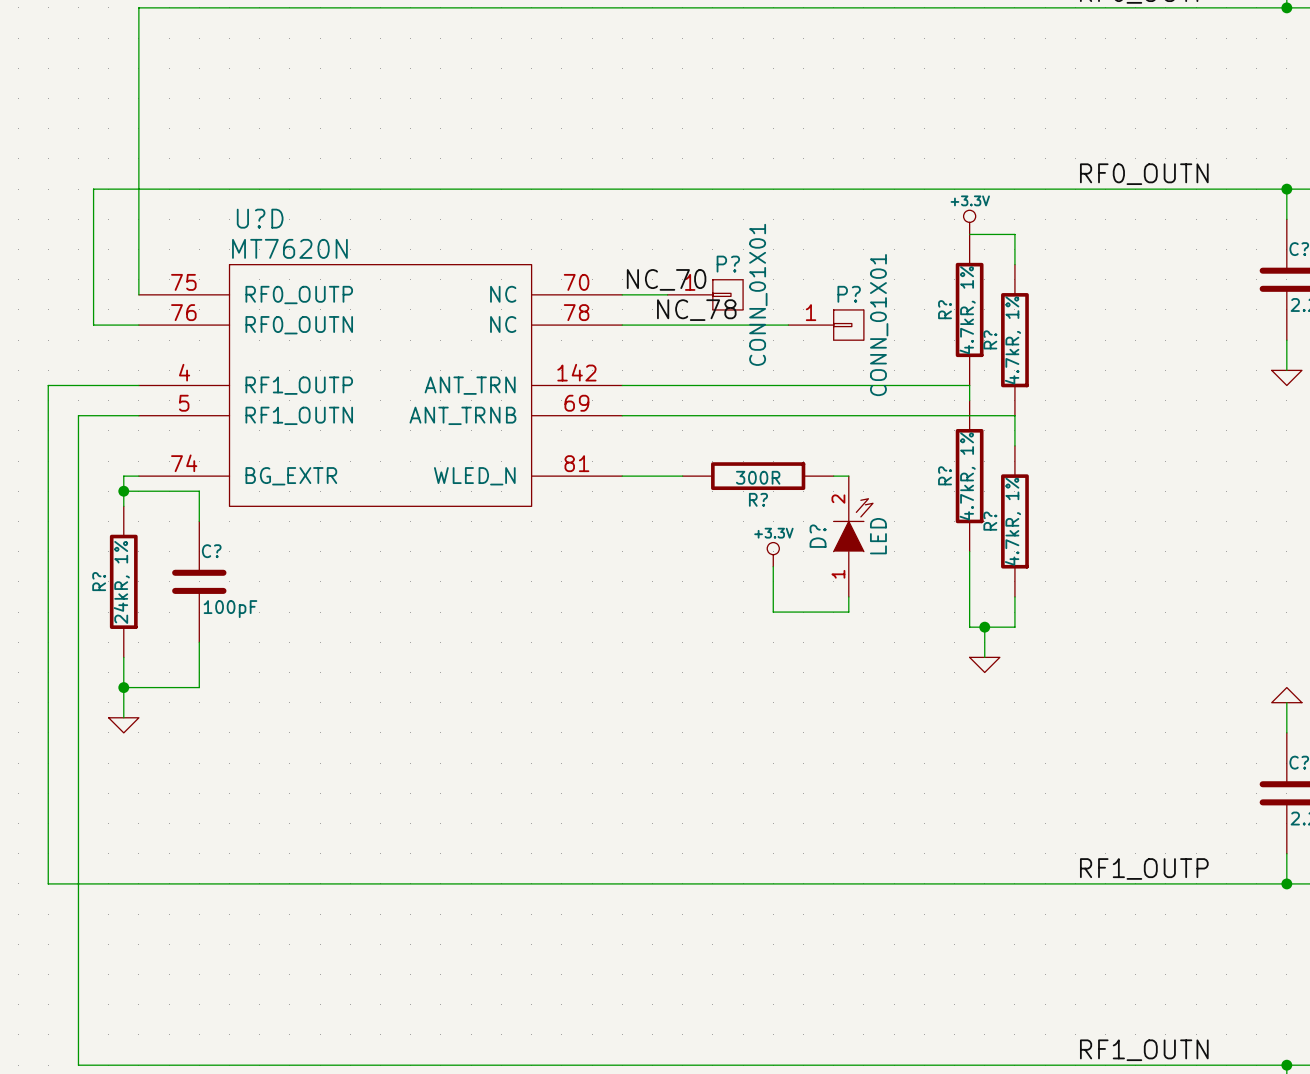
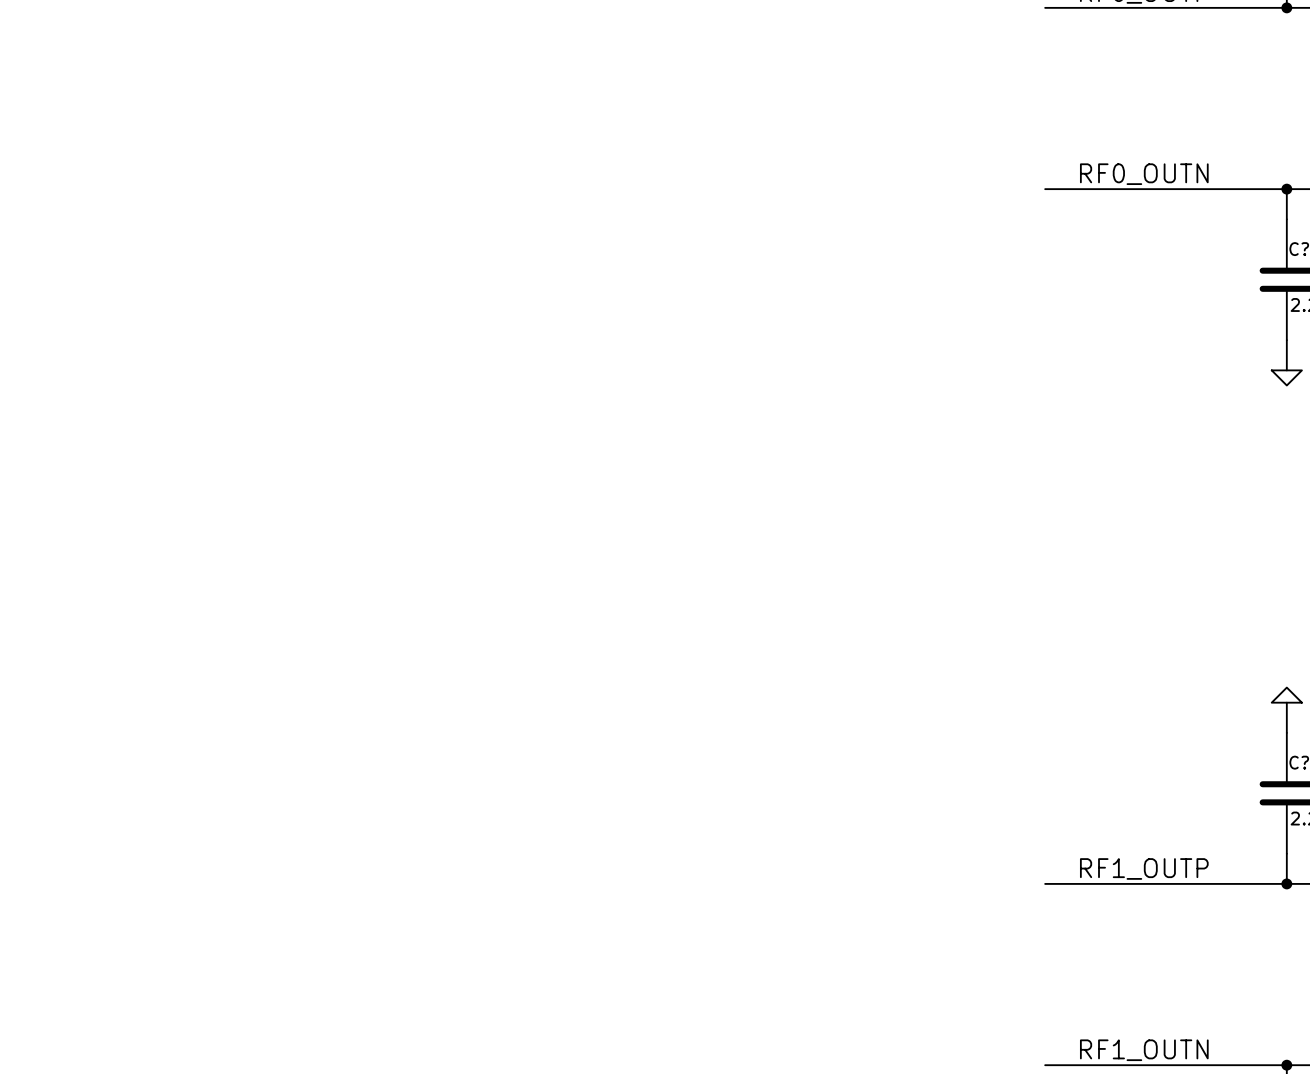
wire: (1045, 7) (138, 7) (138, 294) -> none
wire: (1045, 189) (93, 189) (93, 325) (138, 325) -> none
power symbol: +3.3V (969, 222) -> none
wire: (969, 234) (1014, 234) (1014, 264) -> none
label: NC_70 (666, 279) -> none
wire: (622, 294) (667, 294) -> none
P?: CONN_01X01 (705, 294) -> none
R?: 4.7kR, 1% (969, 309) -> none
label: NC_78 (696, 310) -> none
wire: (622, 325) (788, 325) -> none
P?: CONN_01X01 (826, 325) -> none
R?: 4.7kR, 1% (1014, 340) -> none
wire: (138, 385) (48, 385) (48, 883) (1045, 883) -> none
U?D: MT7620N (380, 385) -> none
wire: (622, 385) (969, 385) (969, 400) -> none
wire: (138, 415) (78, 415) (78, 1065) (1045, 1065) -> none
wire: (622, 415) (1014, 415) (1014, 445) -> none
wire: (138, 476) (123, 476) (123, 506) -> none
wire: (622, 476) (682, 476) -> none
R?: 300R (758, 476) -> none
wire: (833, 476) (848, 476) -> none
R?: 4.7kR, 1% (969, 476) -> none
wire: (123, 491) (199, 491) (199, 521) -> none
junction: (123, 491) -> none
R?: 4.7kR, 1% (1014, 521) -> none
D?: LED (853, 536) -> none
wire: (969, 551) (969, 627) (1014, 627) (1014, 596) -> none
power symbol: +3.3V (773, 554) -> none
wire: (773, 566) (773, 612) (848, 612) (848, 596) -> none
R?: 24kR, 1% (123, 581) -> none
C?: 100pF (199, 581) -> none
wire: (984, 627) (984, 657) -> none
junction: (984, 627) -> none
wire: (199, 642) (199, 687) (123, 687) -> none
wire: (123, 657) (123, 717) -> none
power symbol: (984, 664) -> none
junction: (123, 687) -> none
power symbol: (123, 725) -> none

